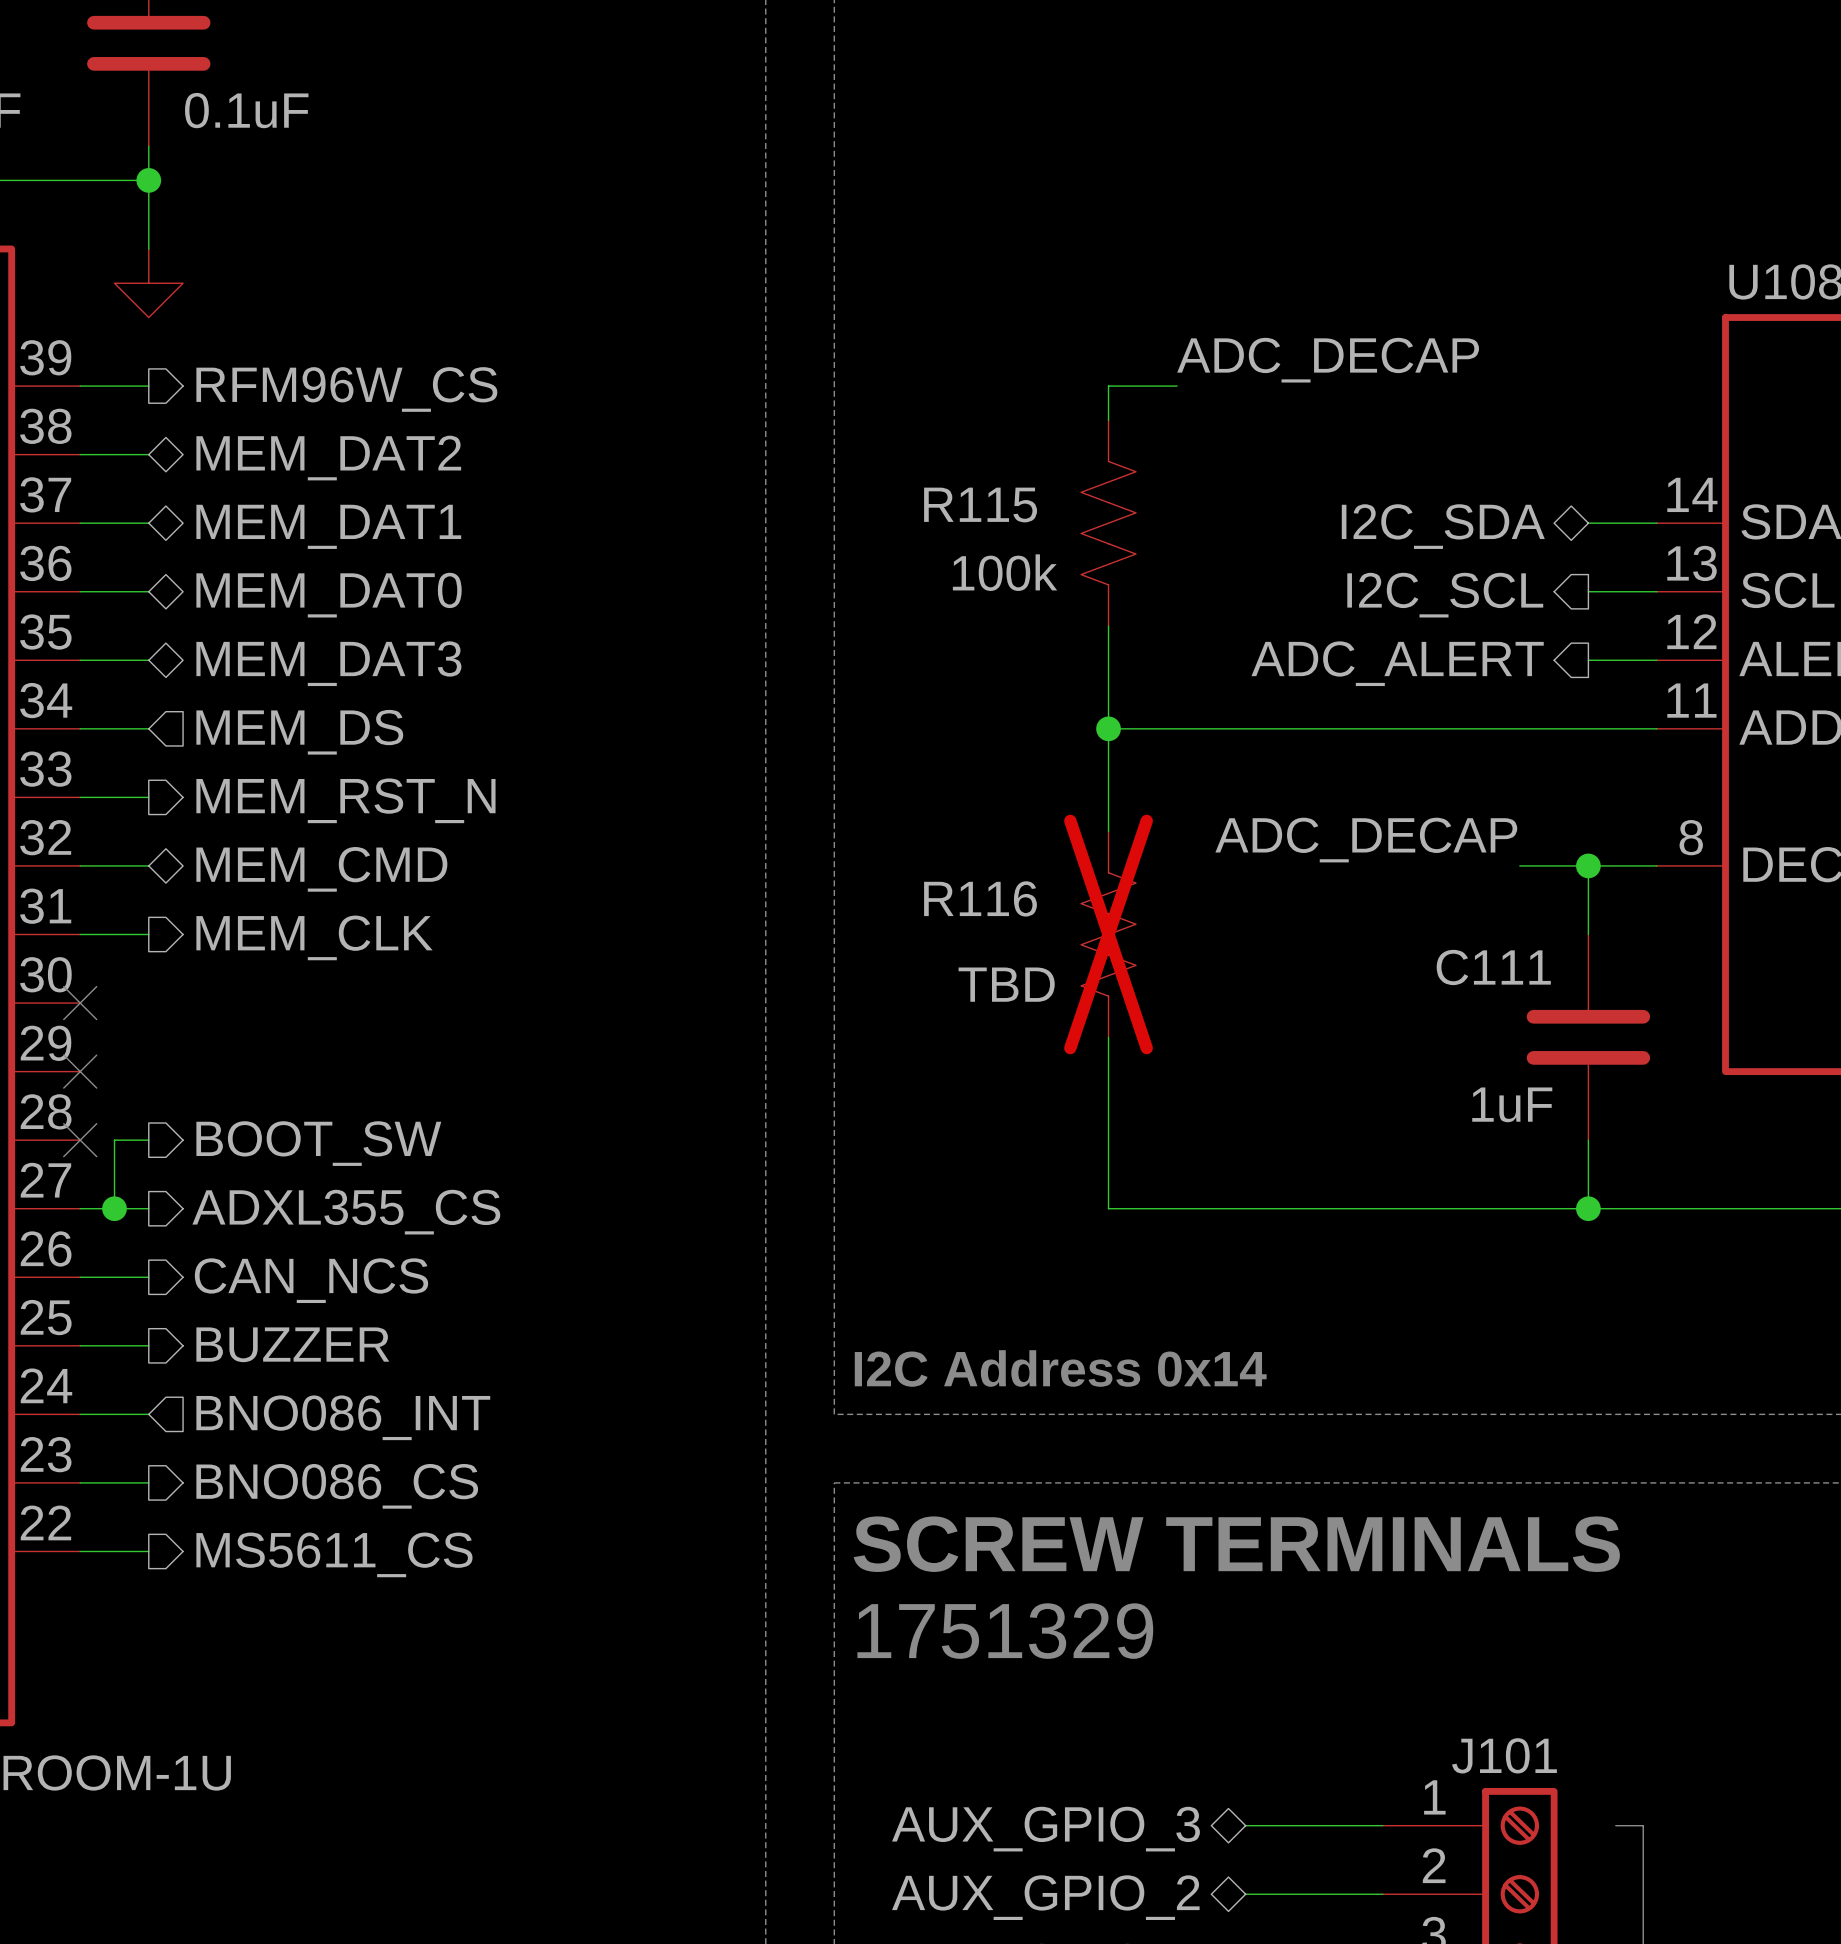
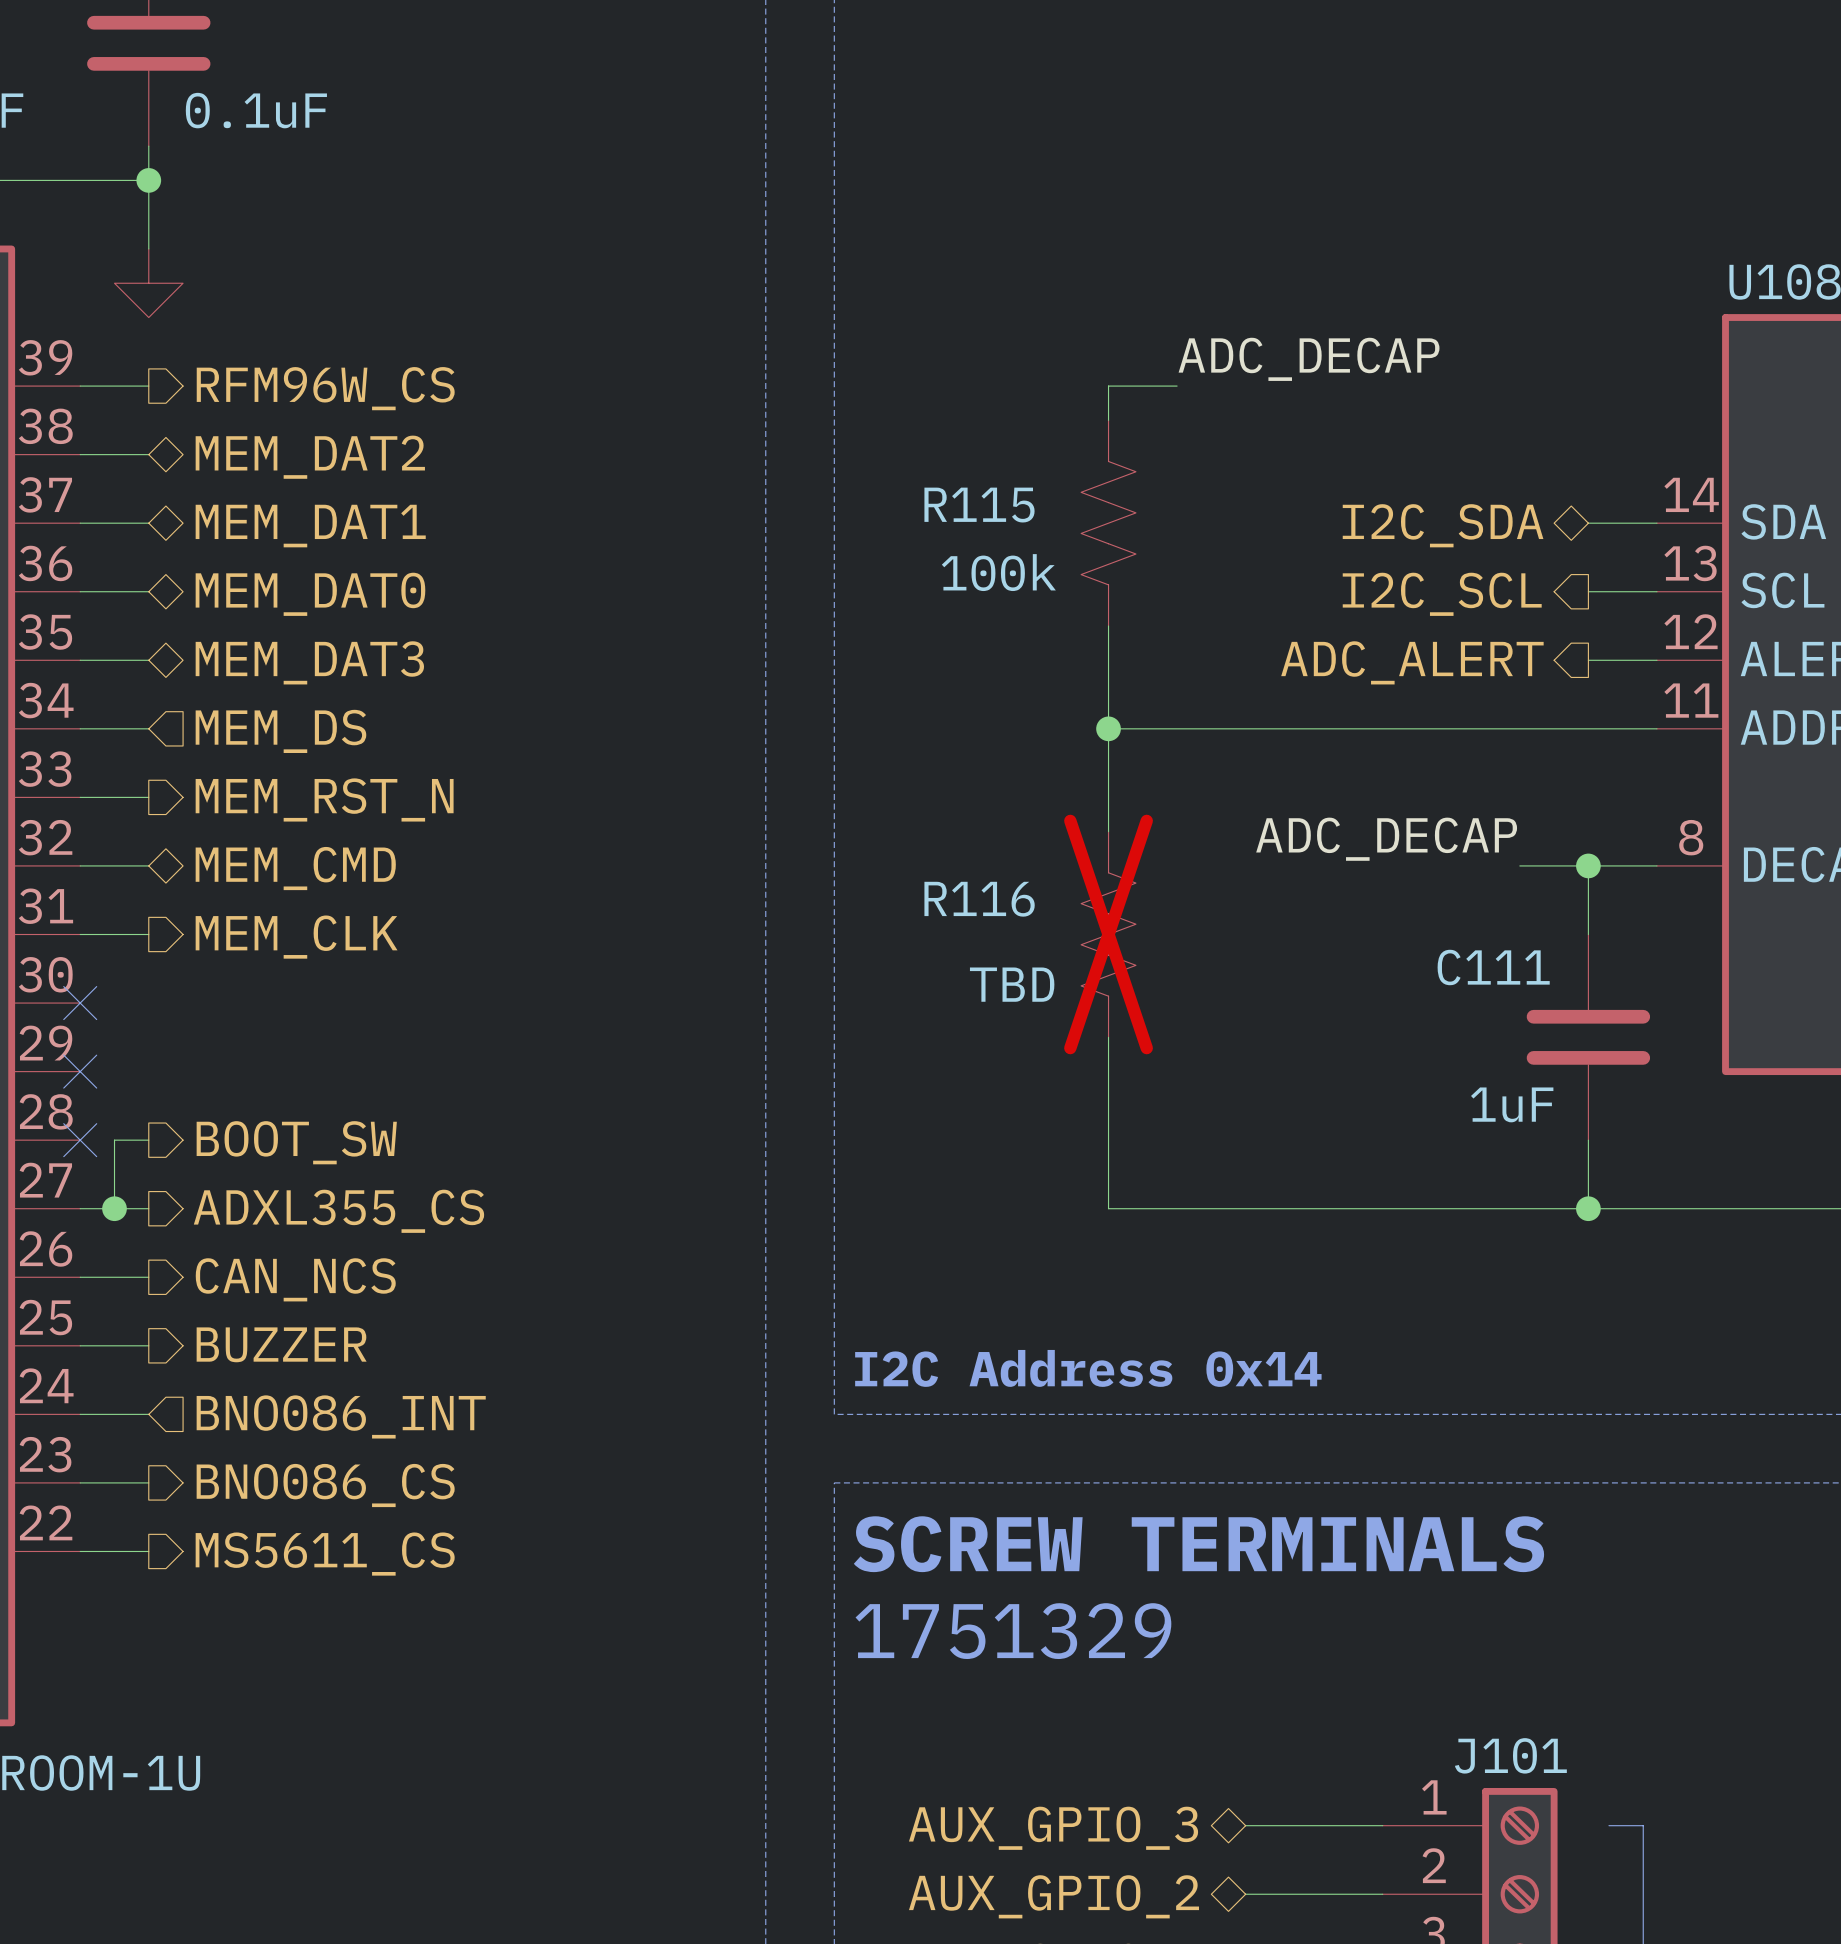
line: none -> (1608, 1825) (1615, 1825)

